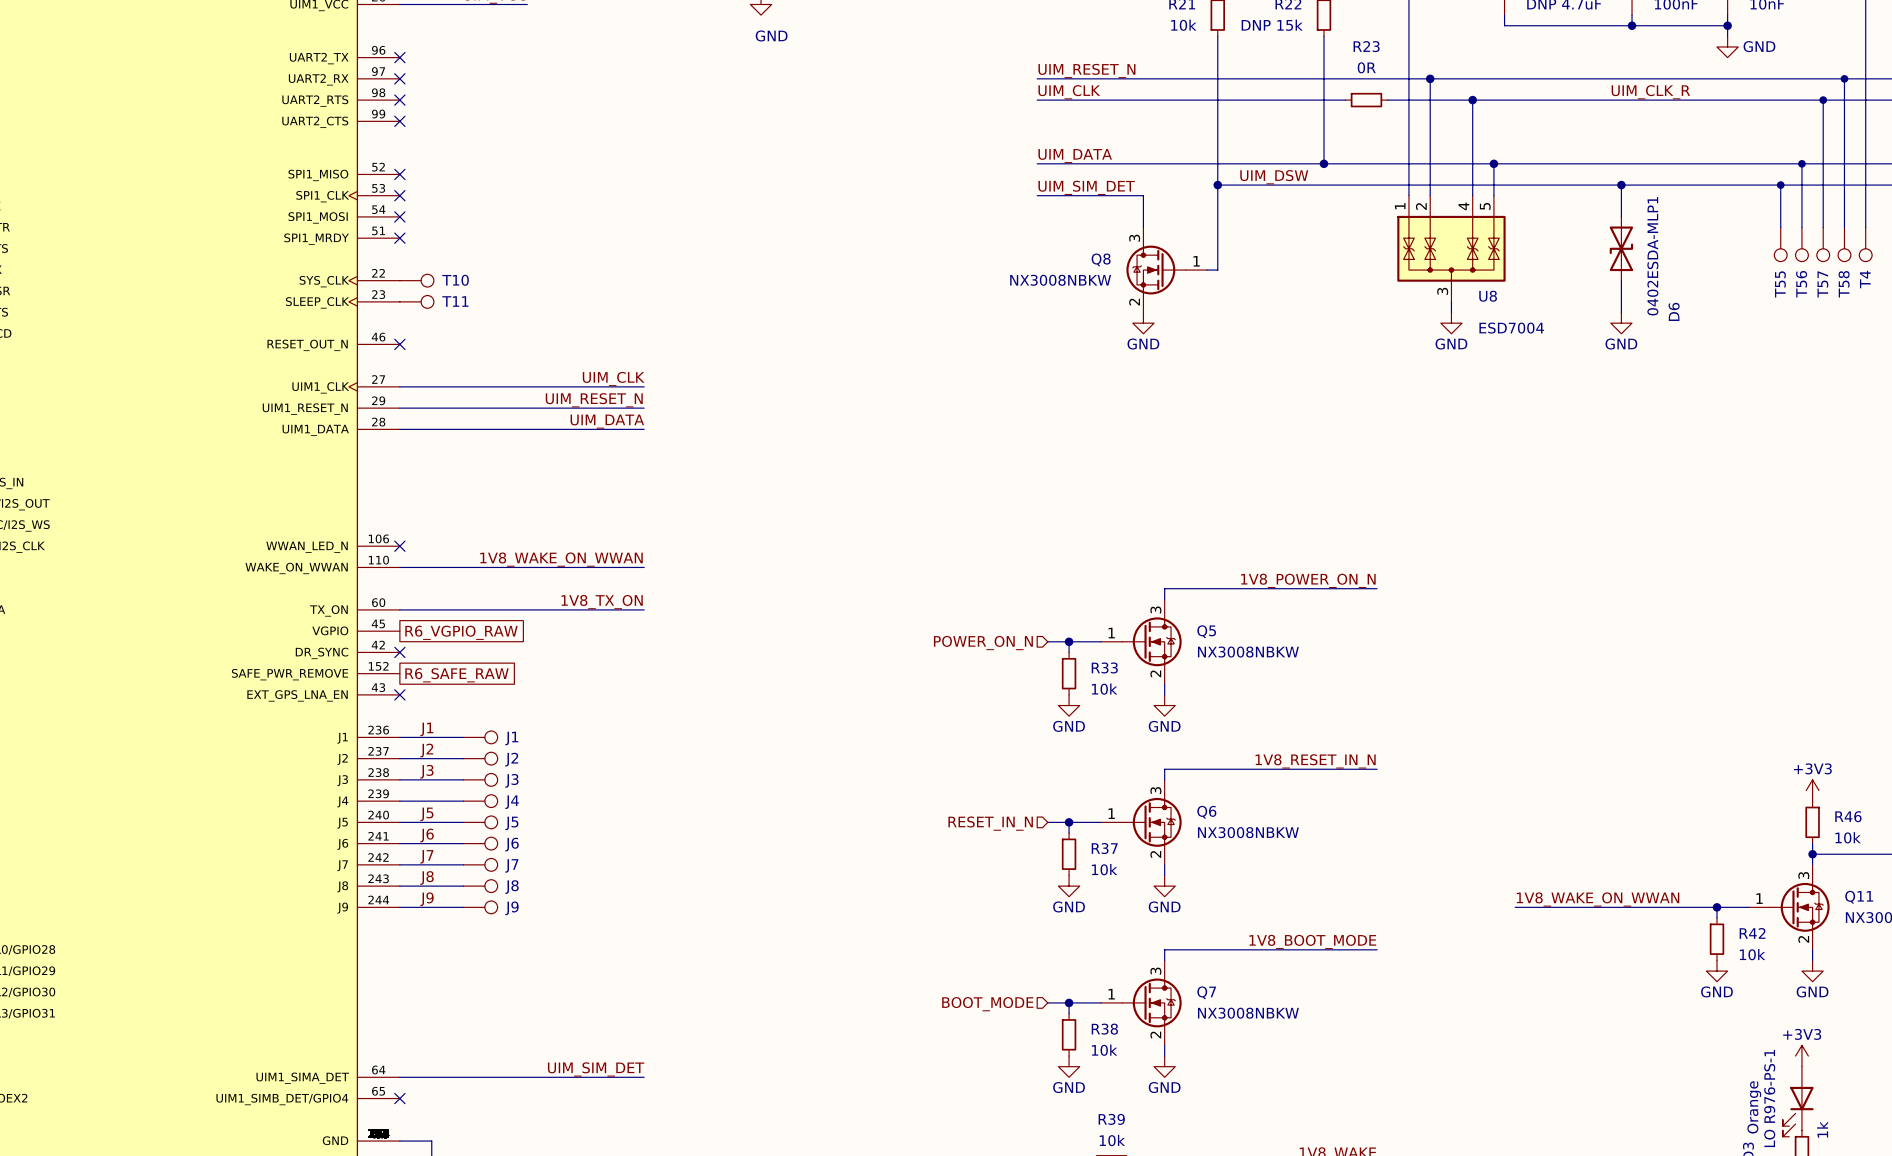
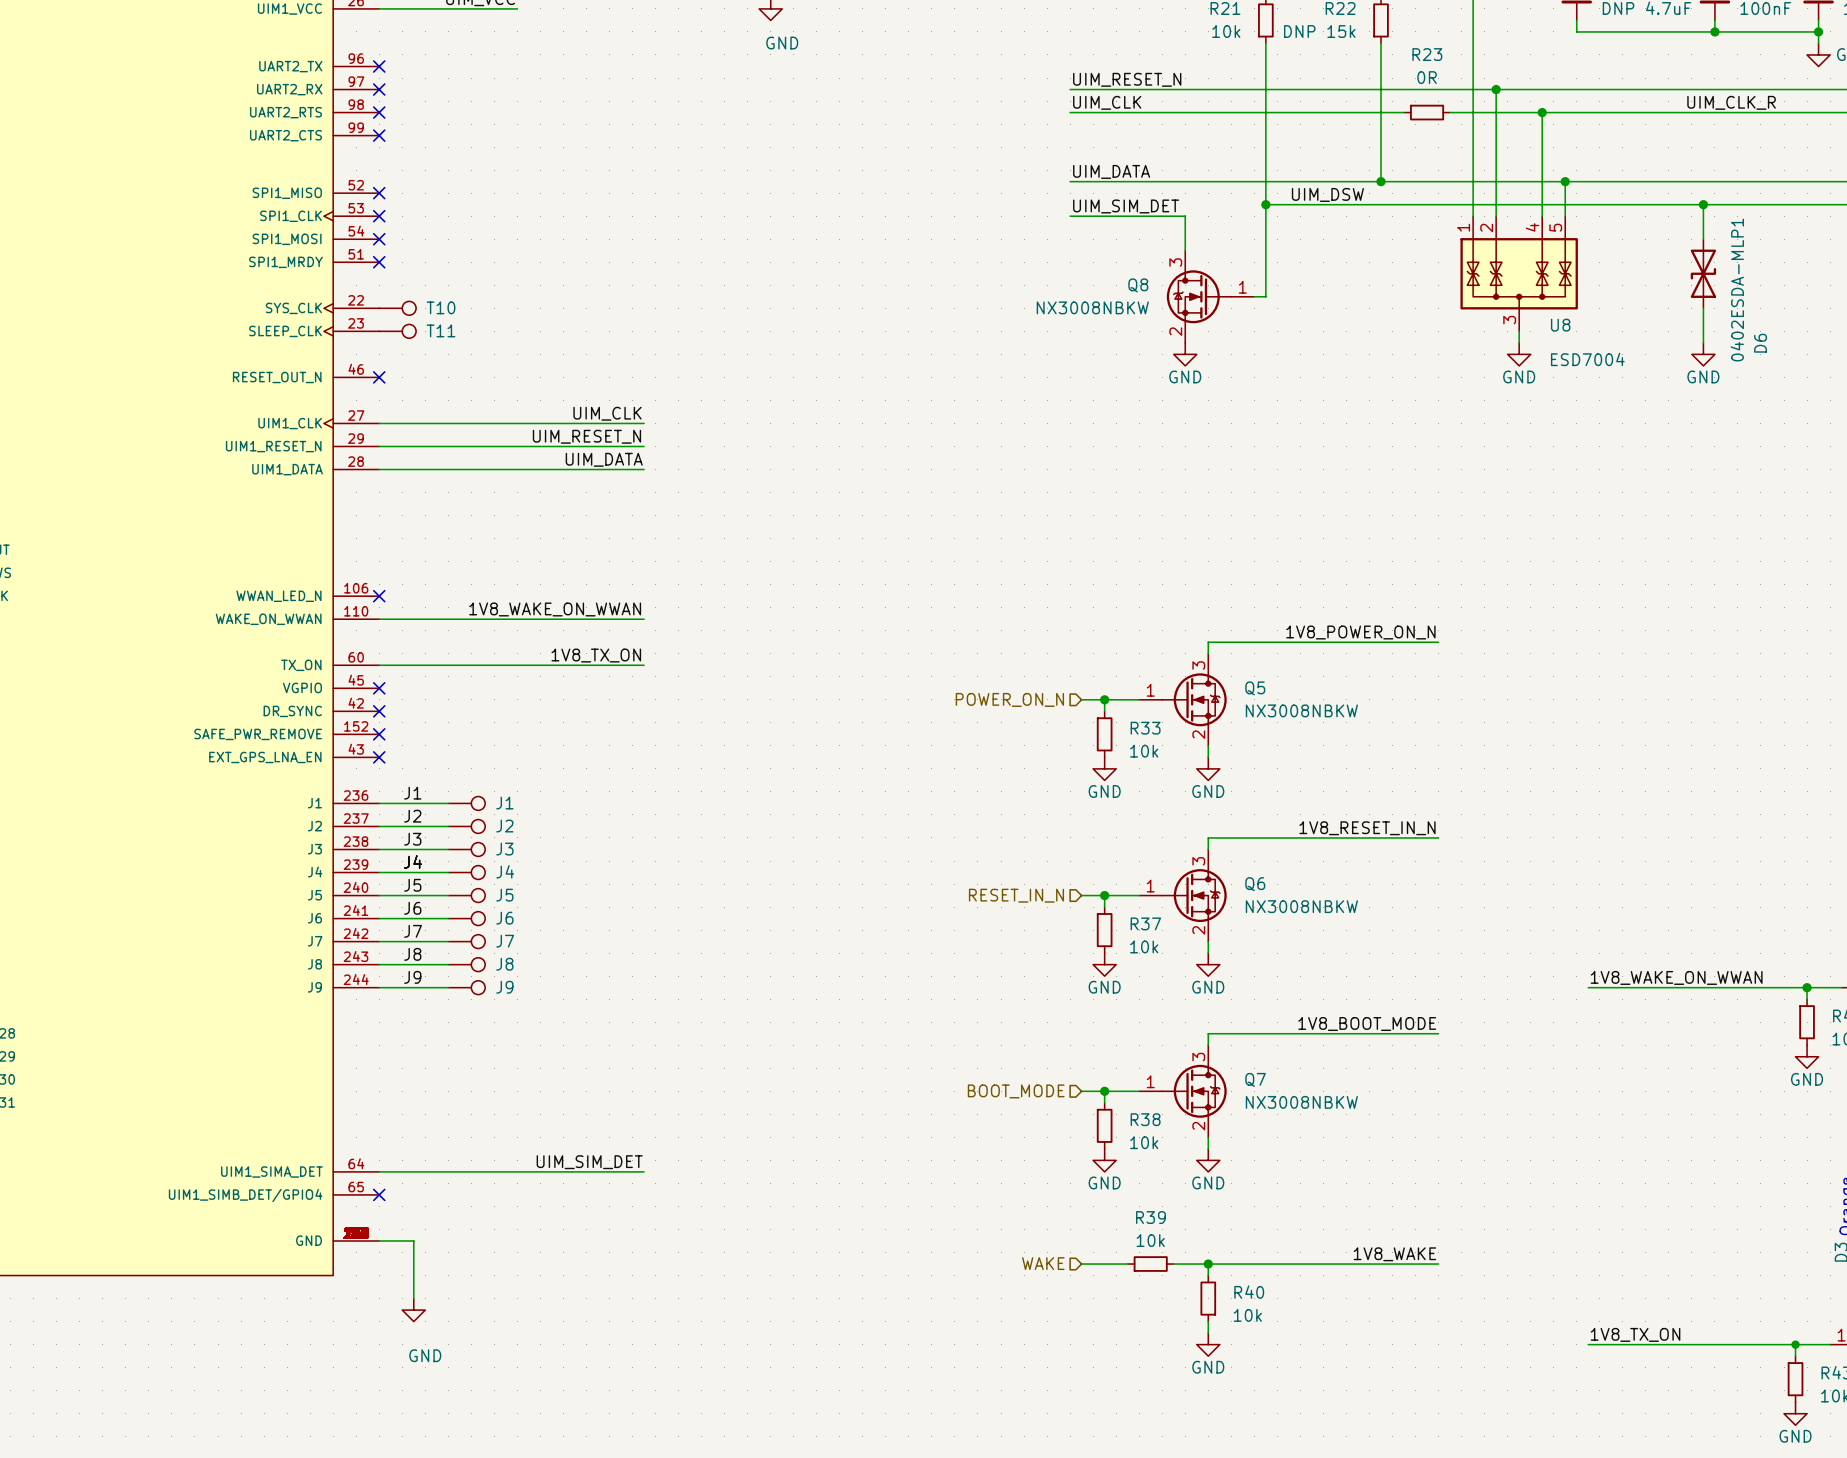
no-connect mark: none -> (379, 688)
global label: R6_VGPIO_RAW (461, 632) -> none
no-connect mark: none -> (379, 734)
global label: R6_SAFE_RAW (456, 675) -> none
label: none -> J4 (413, 861)

